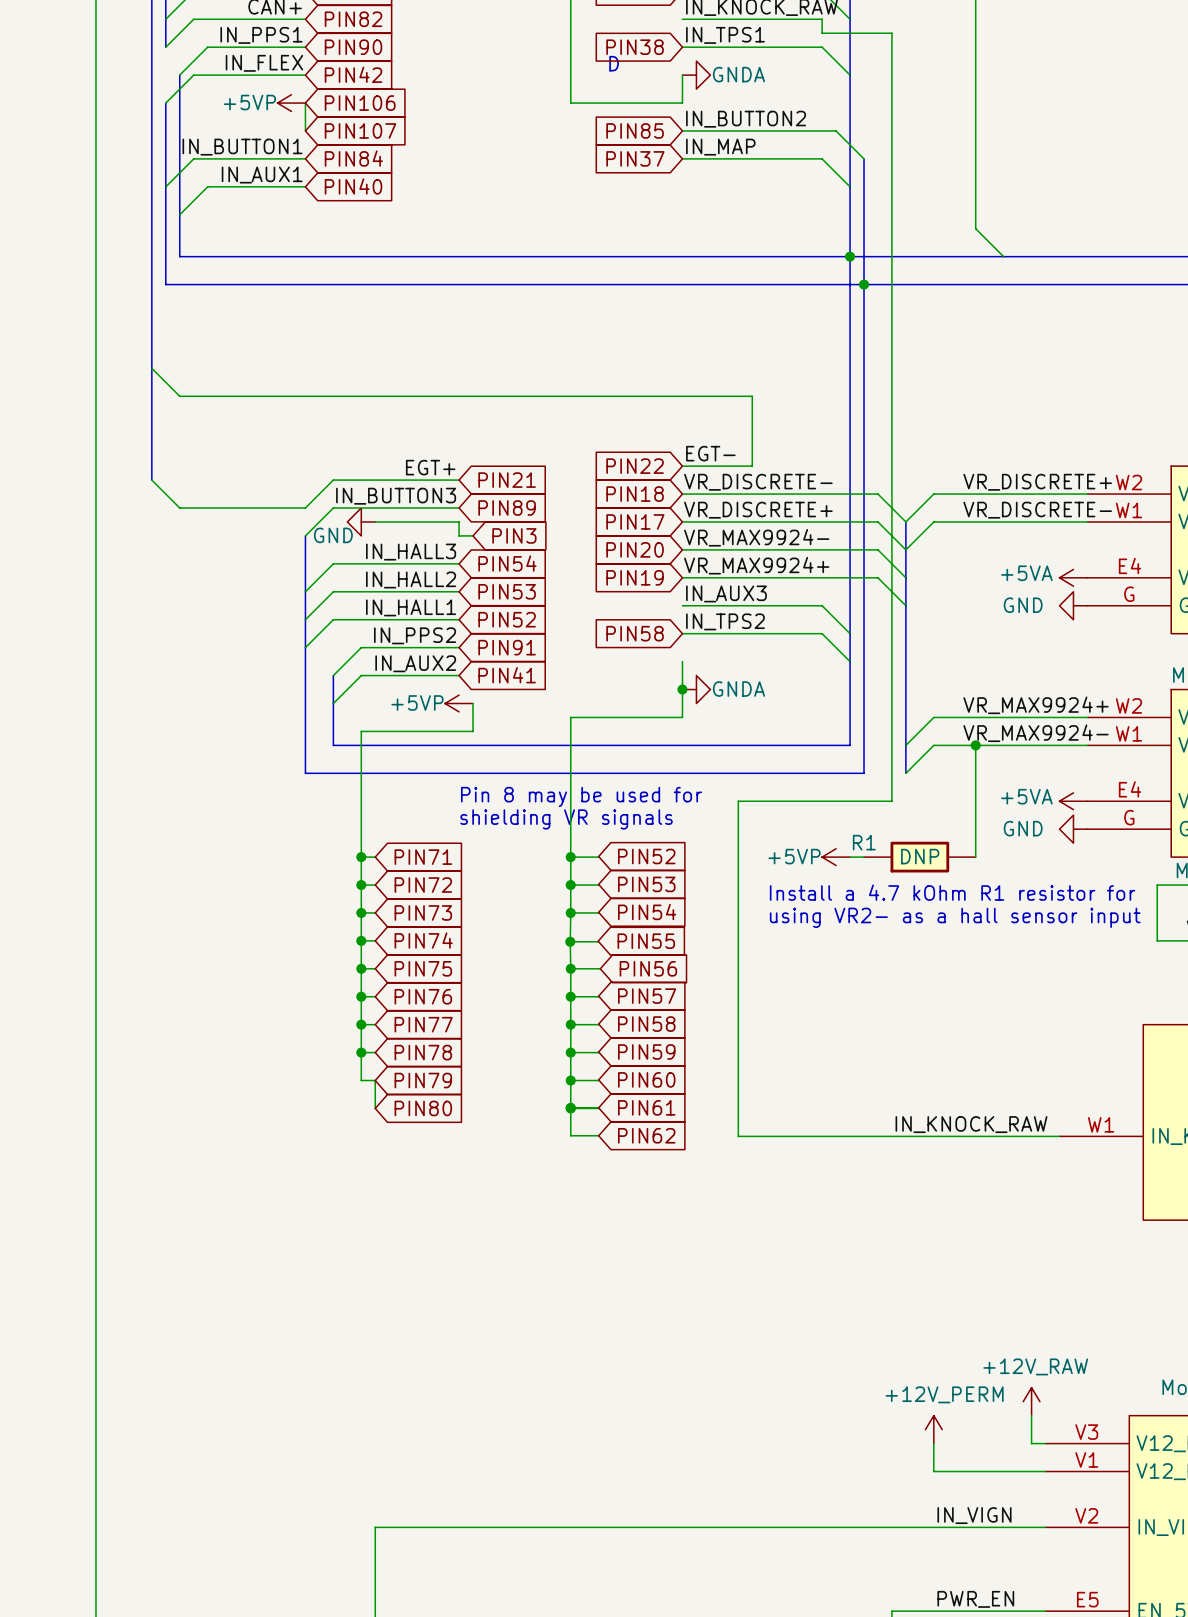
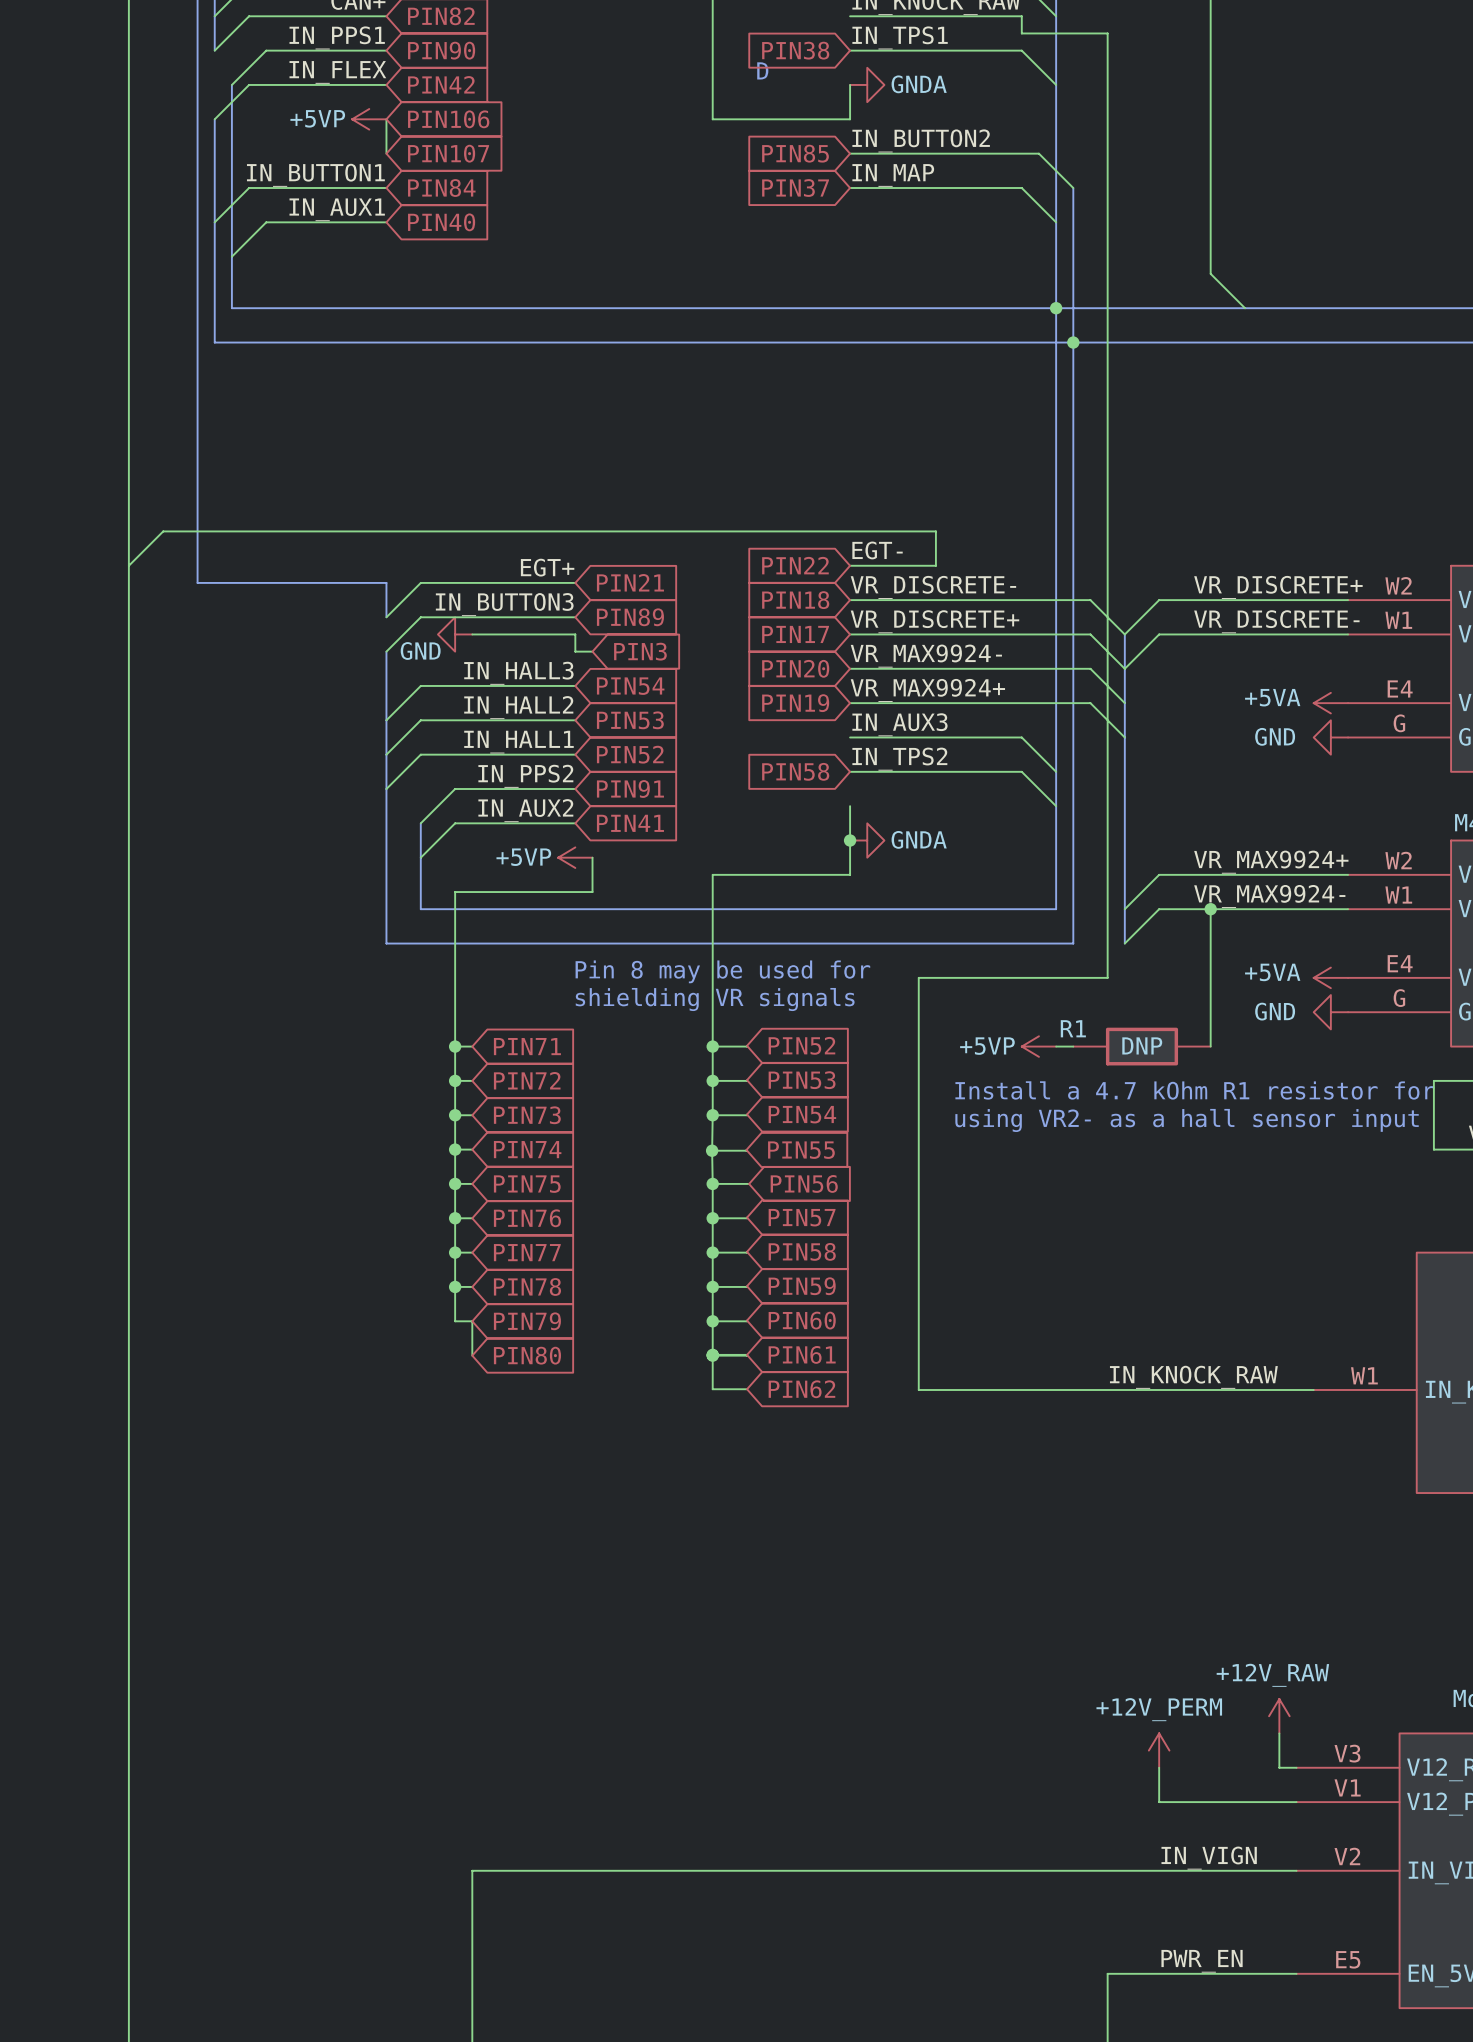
wire: (151, 368) (179, 396) (752, 396) (752, 438) -> (128, 565) (163, 531) (935, 531)
wire: (151, 480) (179, 508) (305, 508) -> none
bus: none -> (197, 582) (386, 582) (386, 617)

